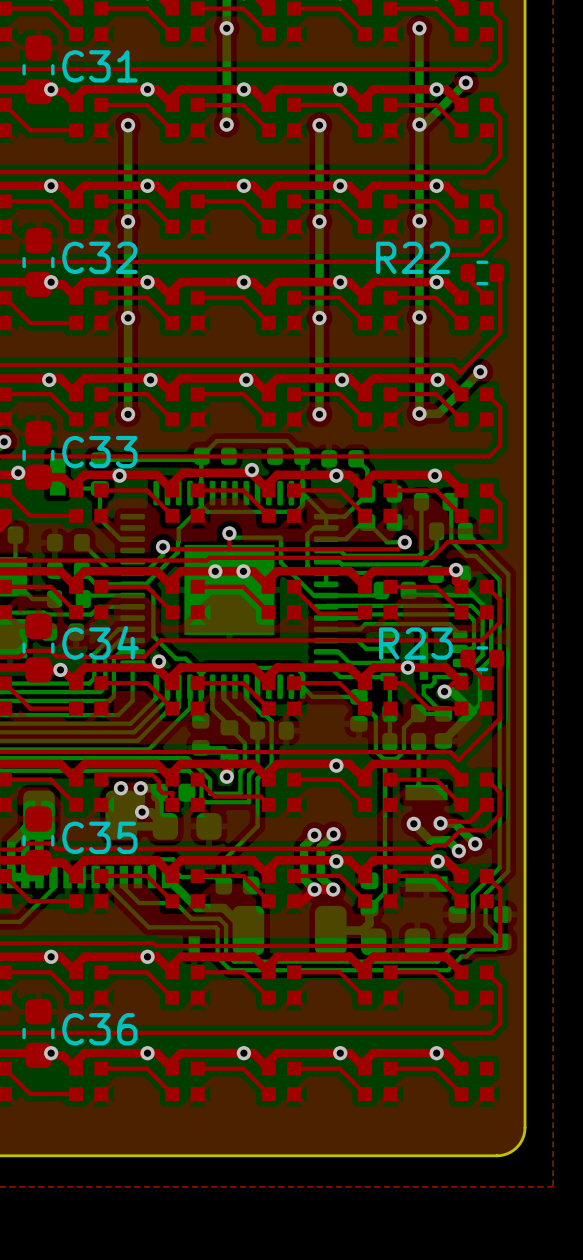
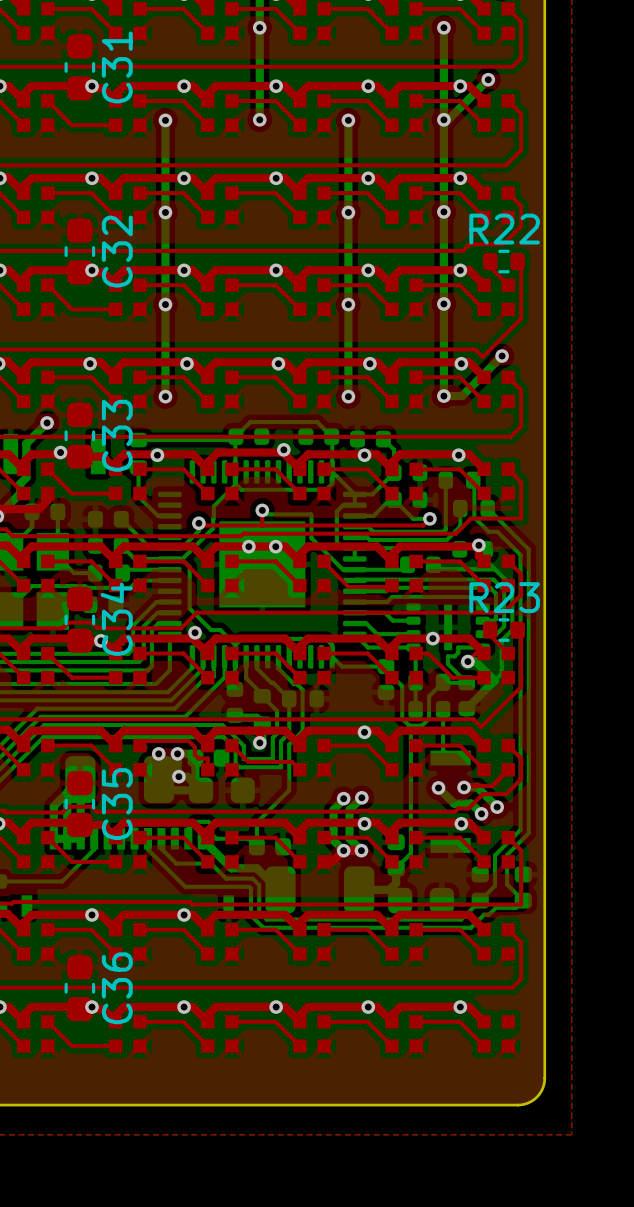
C31 name rotation: 0° (99, 66) -> 90° counterclockwise (117, 67)
C32 name rotation: 0° (99, 257) -> 90° counterclockwise (117, 251)
R22 name position: R22 (413, 257) -> R22 (504, 229)
C33 name rotation: 0° (99, 452) -> 90° counterclockwise (117, 435)
C34 name rotation: 0° (100, 642) -> 90° counterclockwise (116, 619)
R23 name position: R23 (415, 643) -> R23 (504, 597)
C35 name rotation: 0° (99, 837) -> 90° counterclockwise (117, 804)
C36 name rotation: 0° (99, 1029) -> 90° counterclockwise (117, 988)

